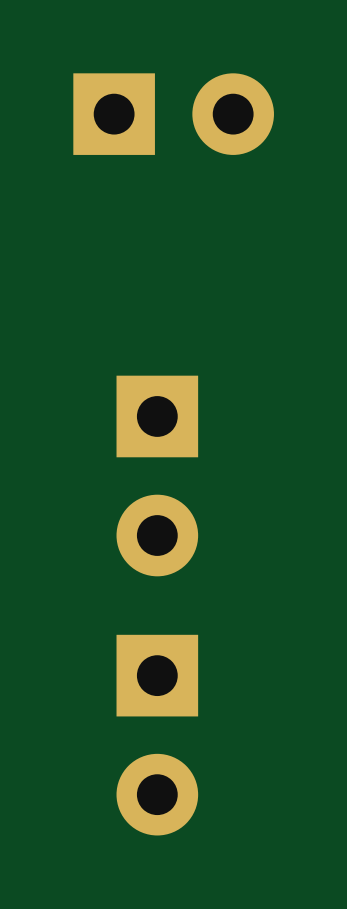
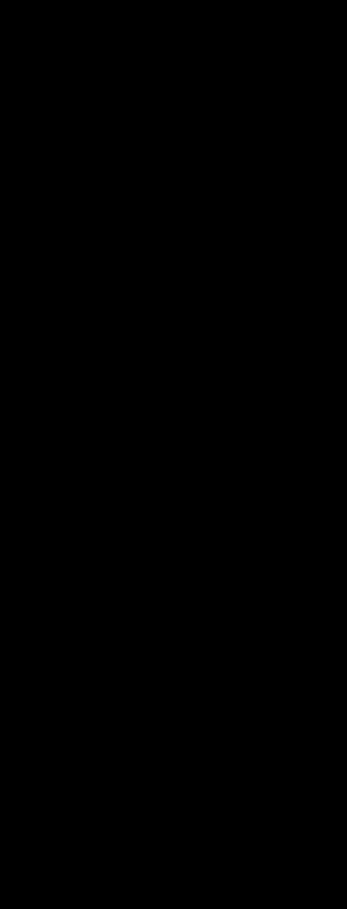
part: (173, 114) -> none
part: (157, 475) -> none
part: (157, 735) -> none

